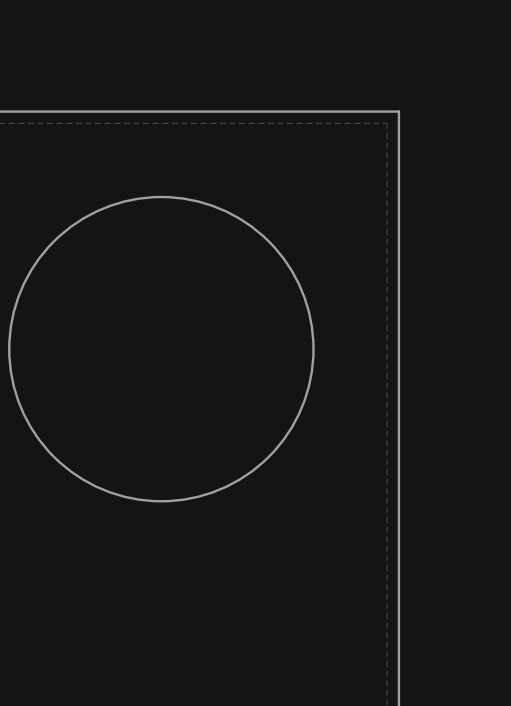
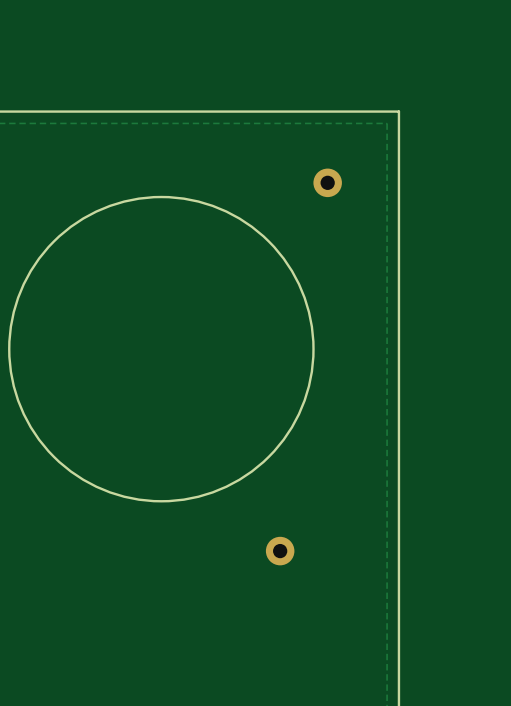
via: none -> (327, 182)
via: none -> (280, 551)

